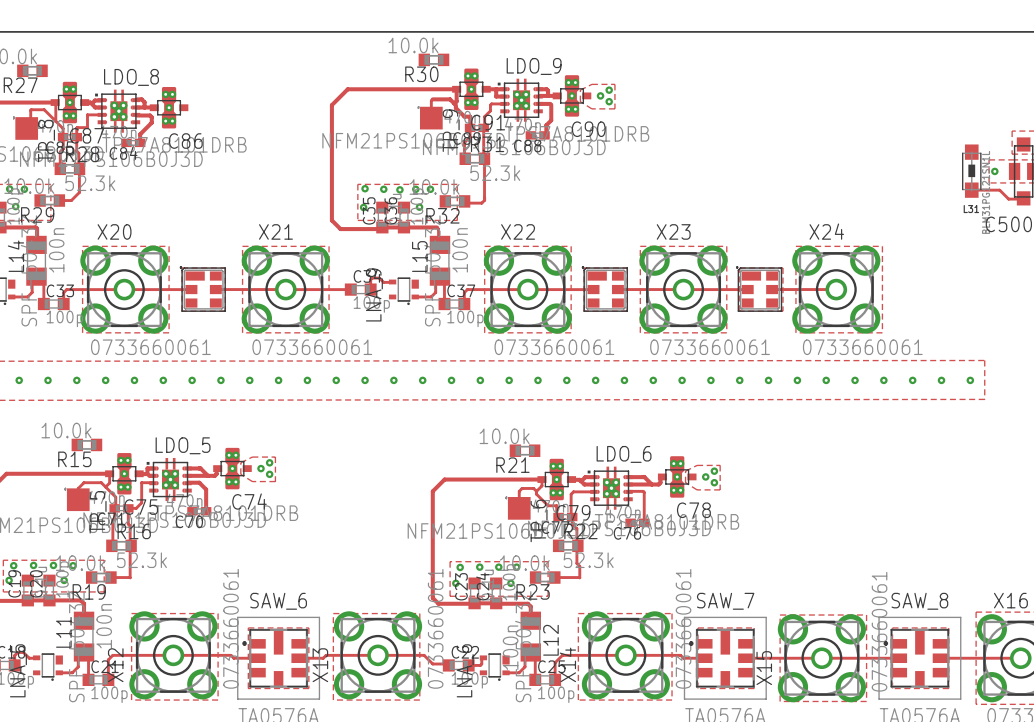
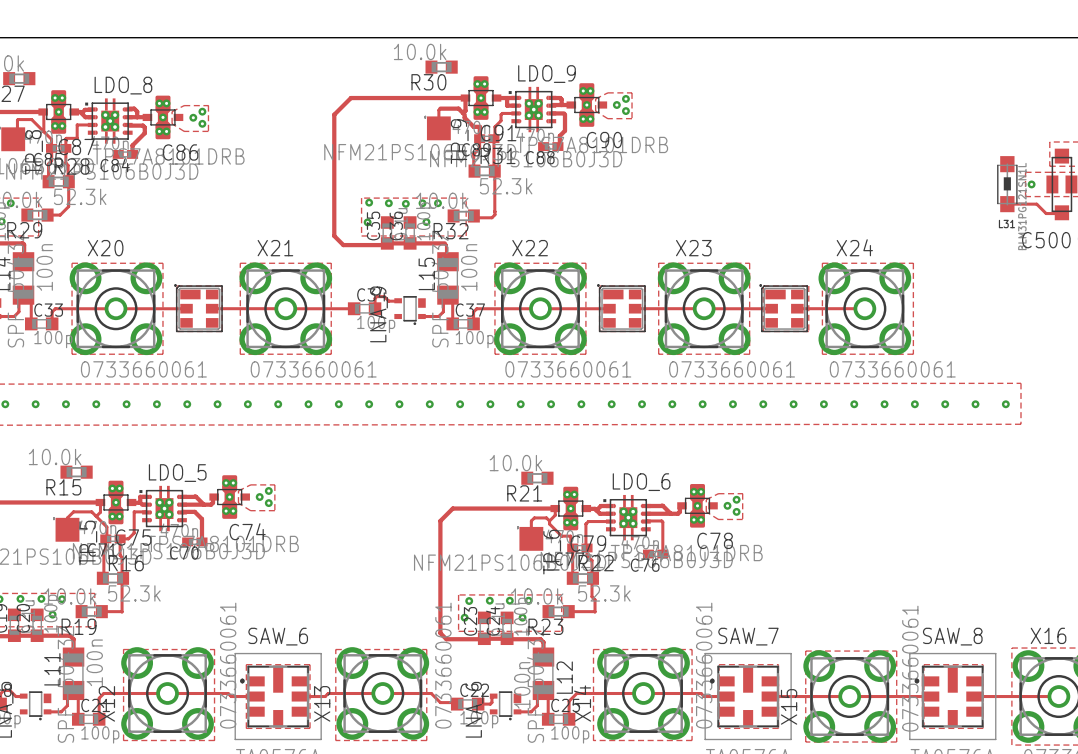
zone outline: none -> (184, 105) (172, 111) (172, 123) (184, 131) (208, 131) (208, 105) (184, 105)
via: none -> (202, 111)
via: none -> (193, 117)
via: none -> (202, 123)
track: none -> (572, 547) (572, 578)

